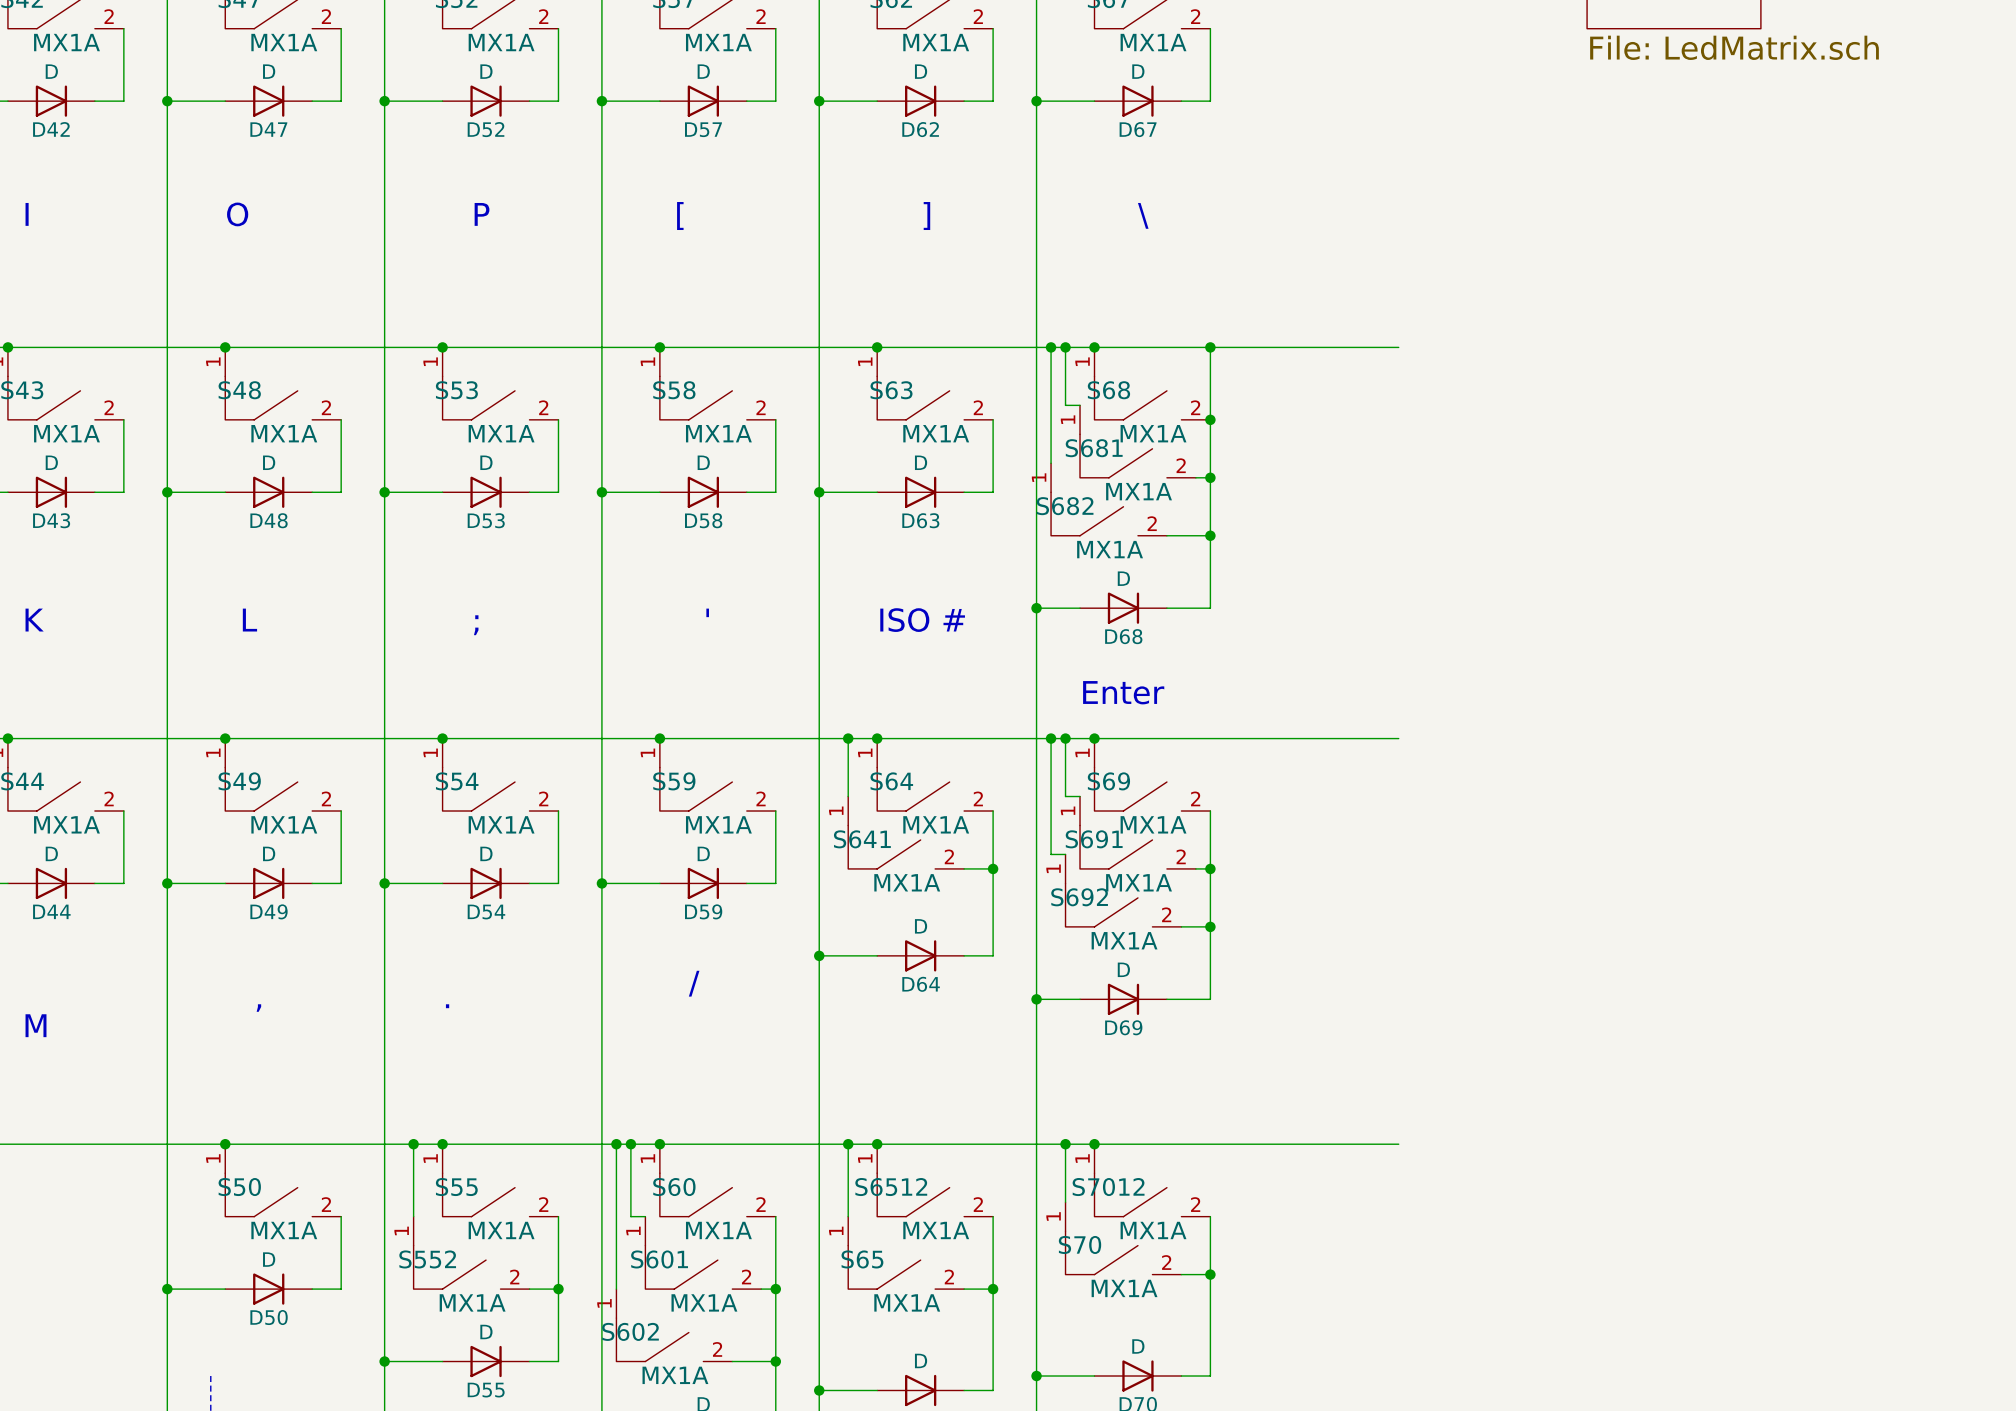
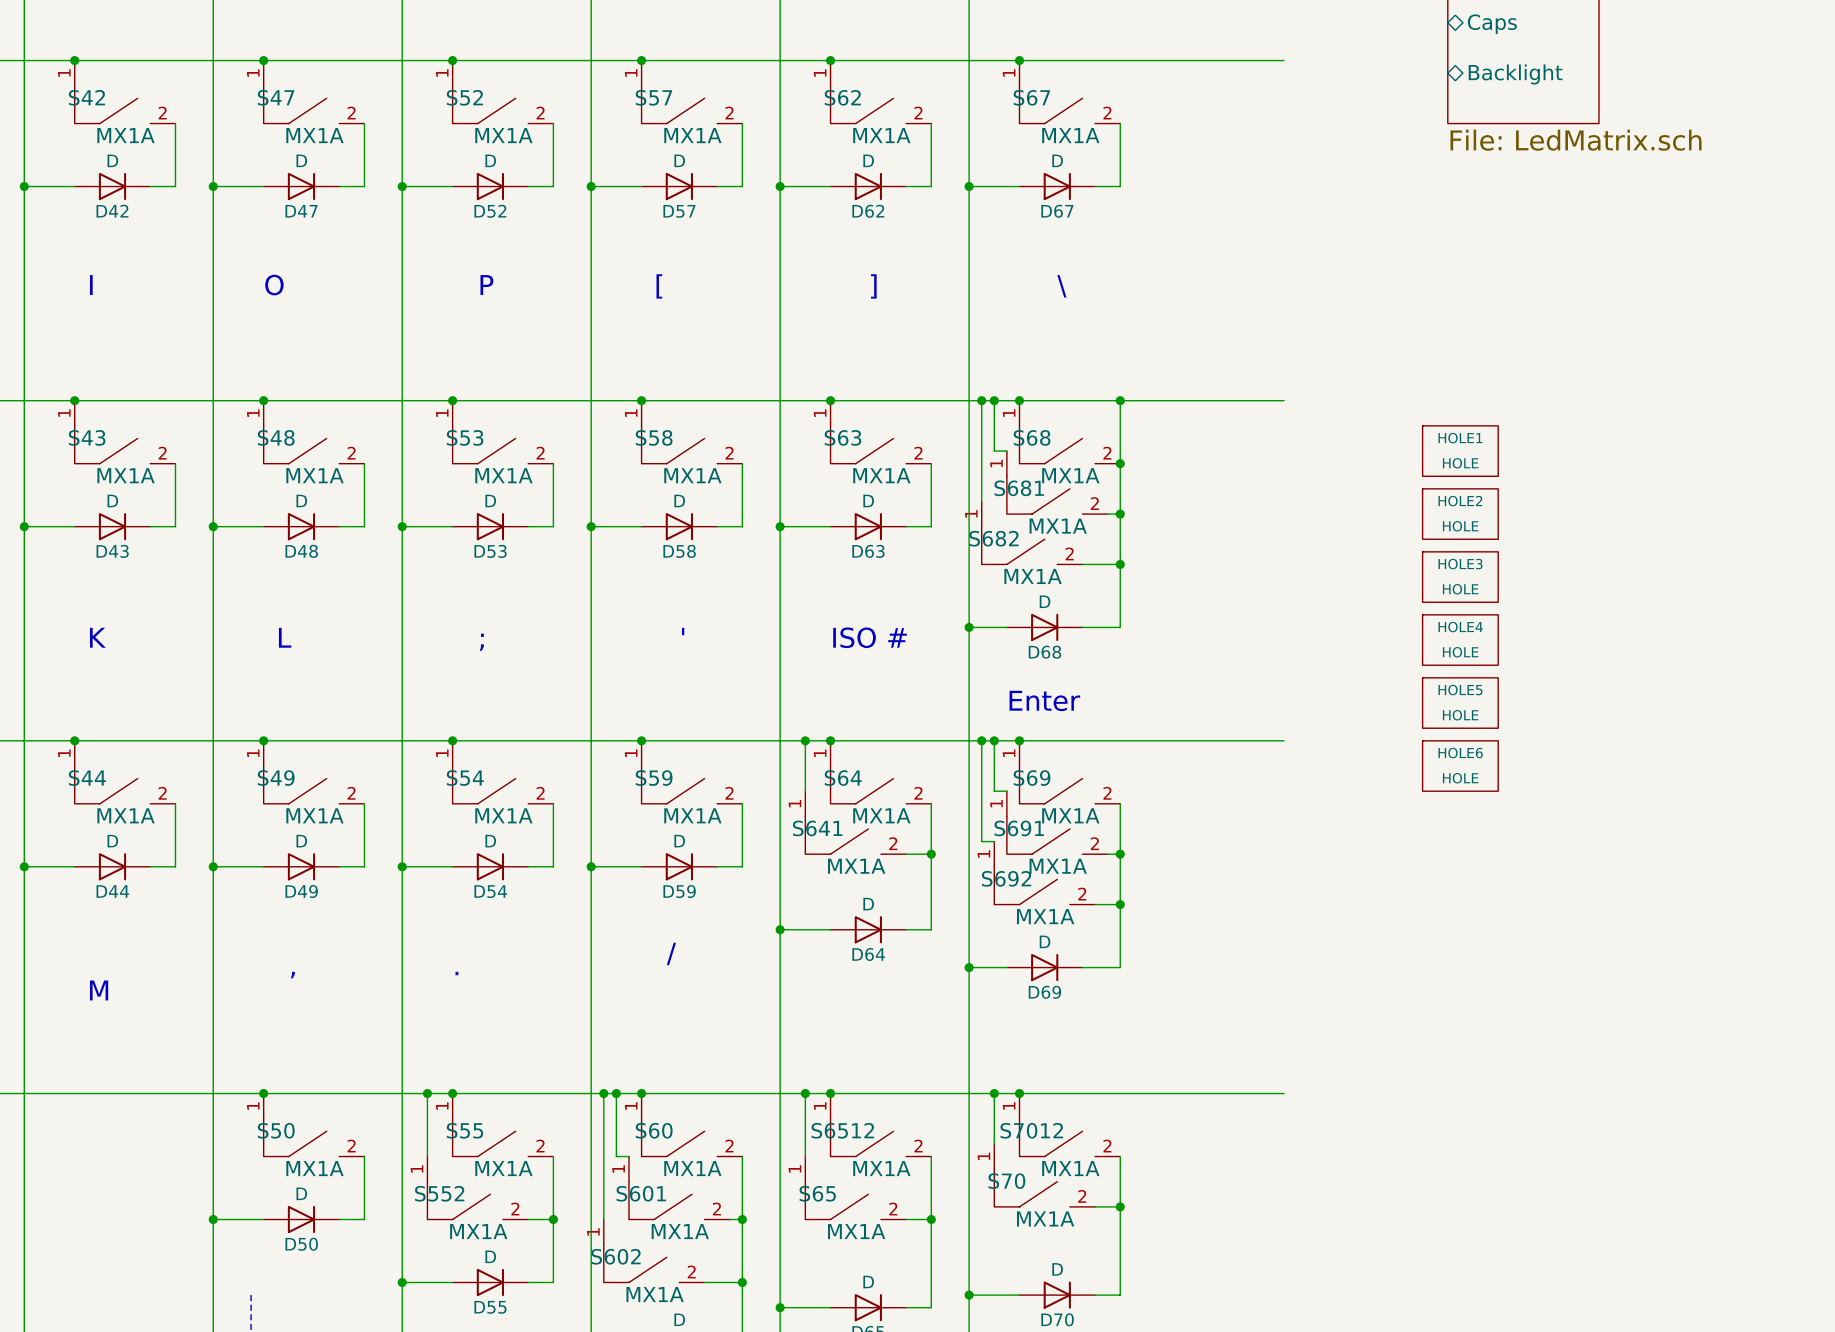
HOLE1: none -> HOLE (1460, 451)
HOLE2: none -> HOLE (1460, 514)
HOLE3: none -> HOLE (1460, 577)
HOLE4: none -> HOLE (1460, 640)
HOLE5: none -> HOLE (1460, 703)
HOLE6: none -> HOLE (1460, 766)

